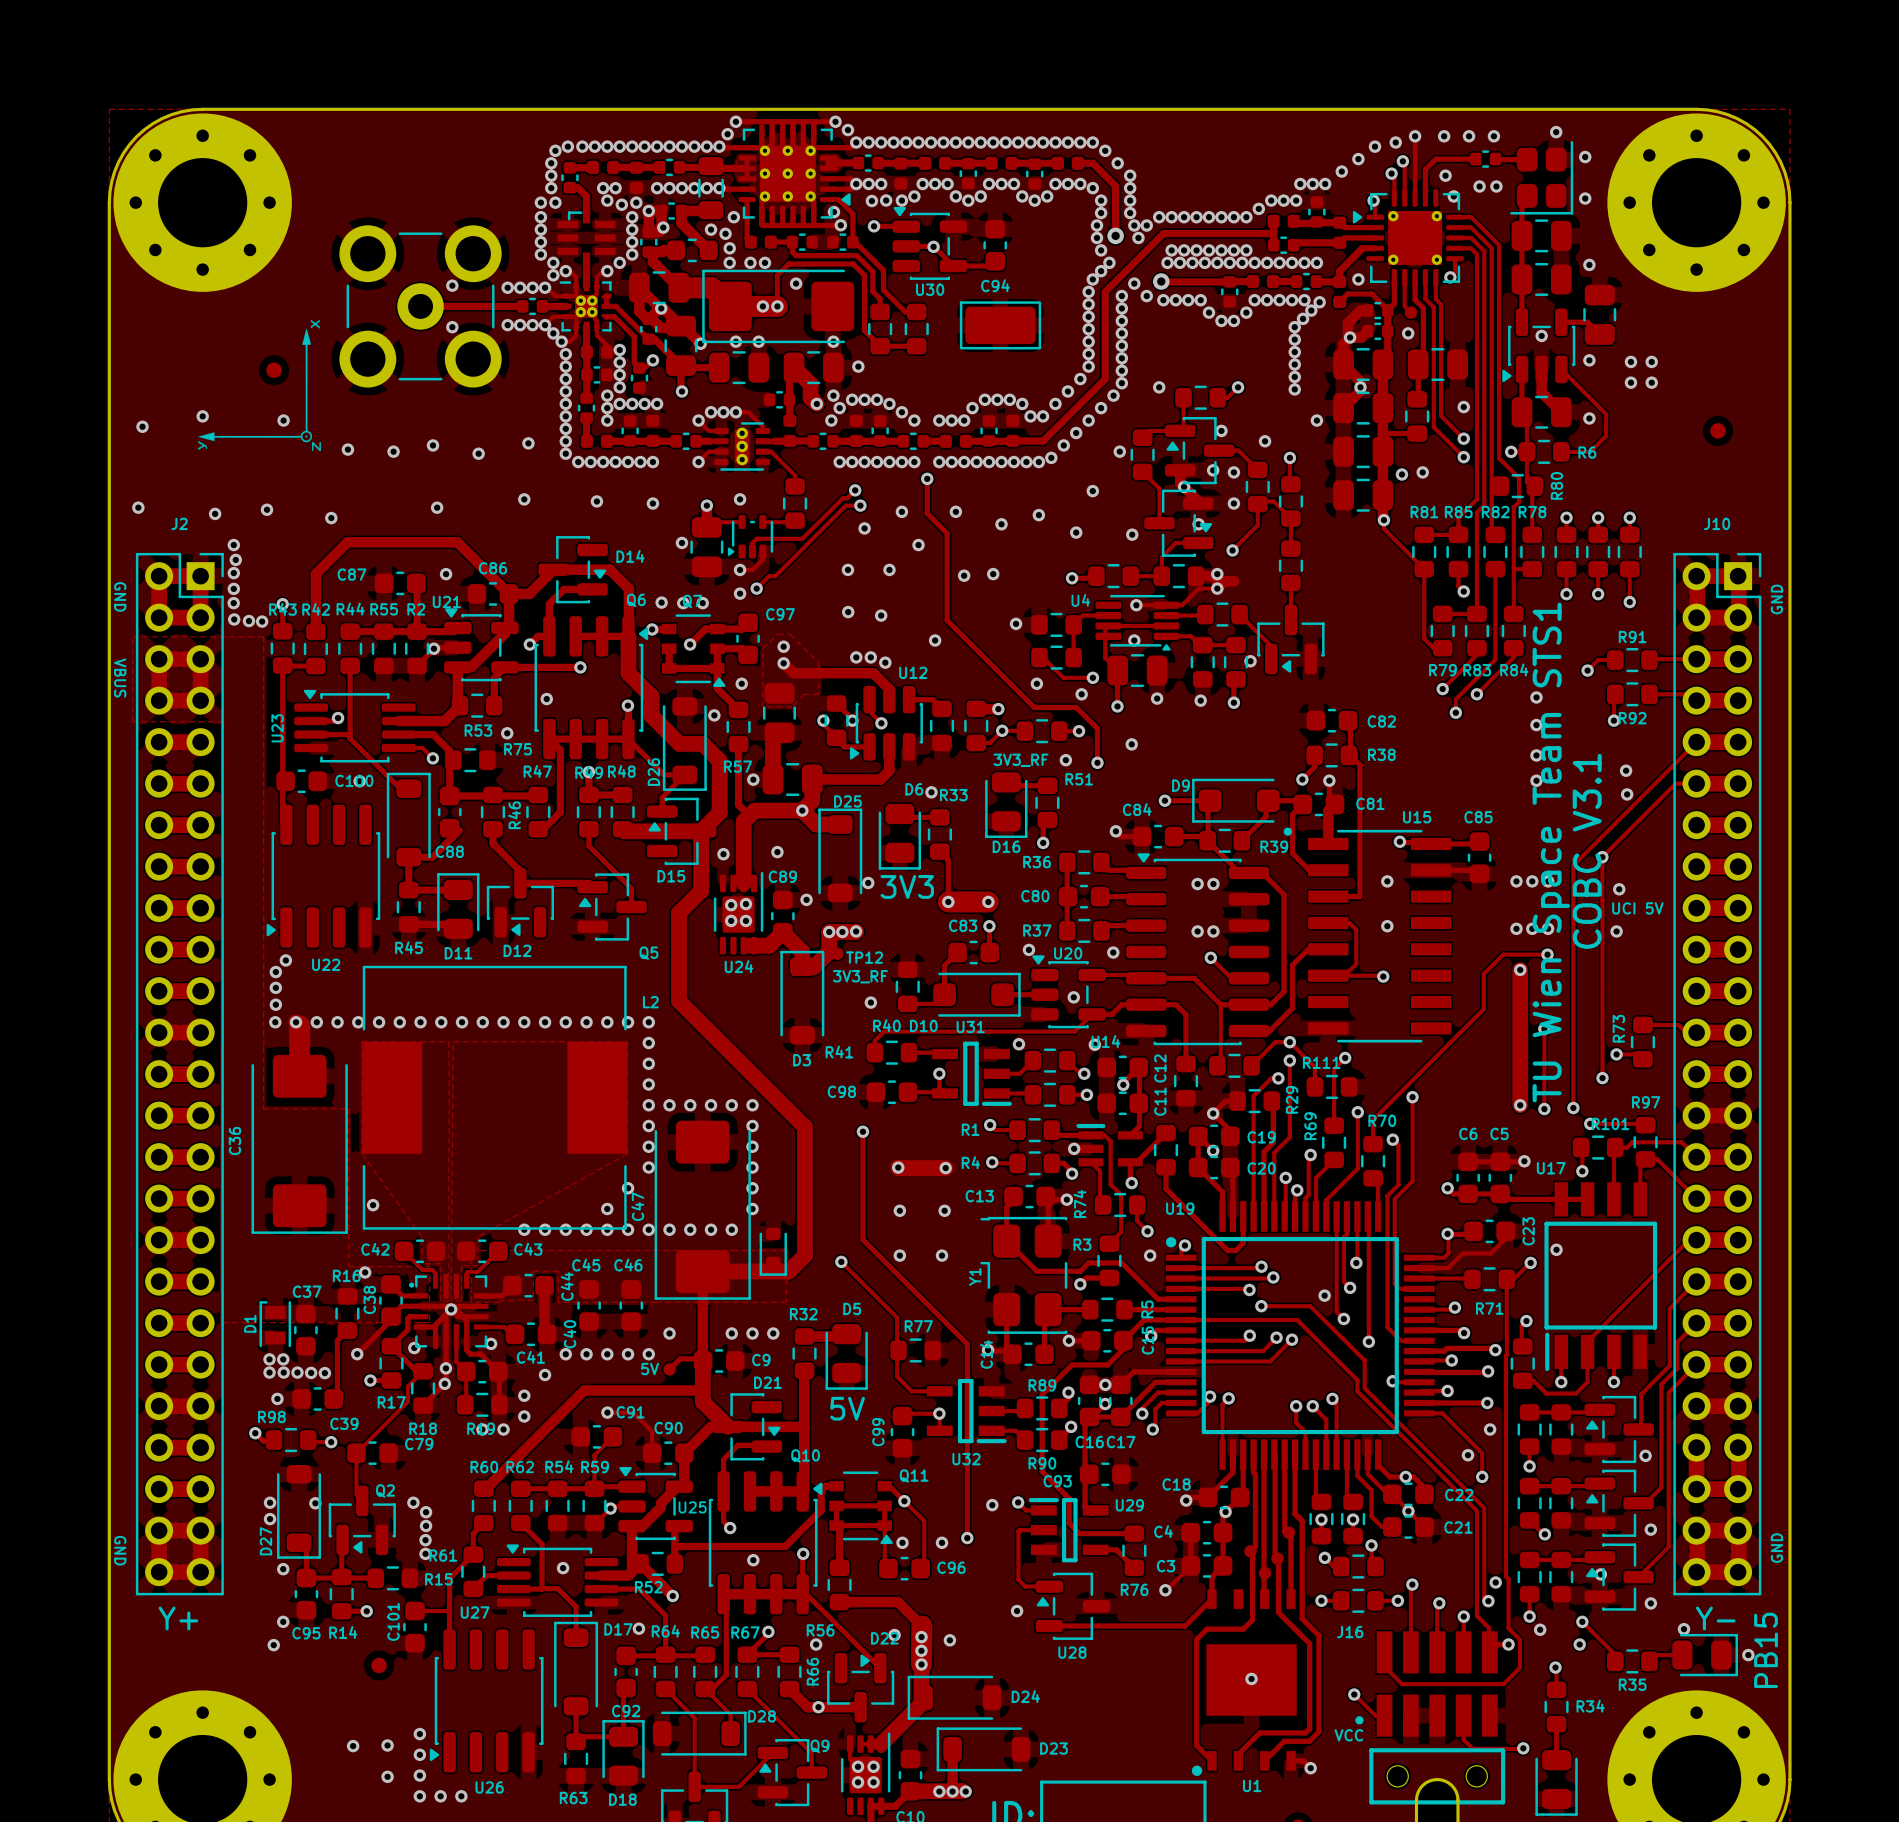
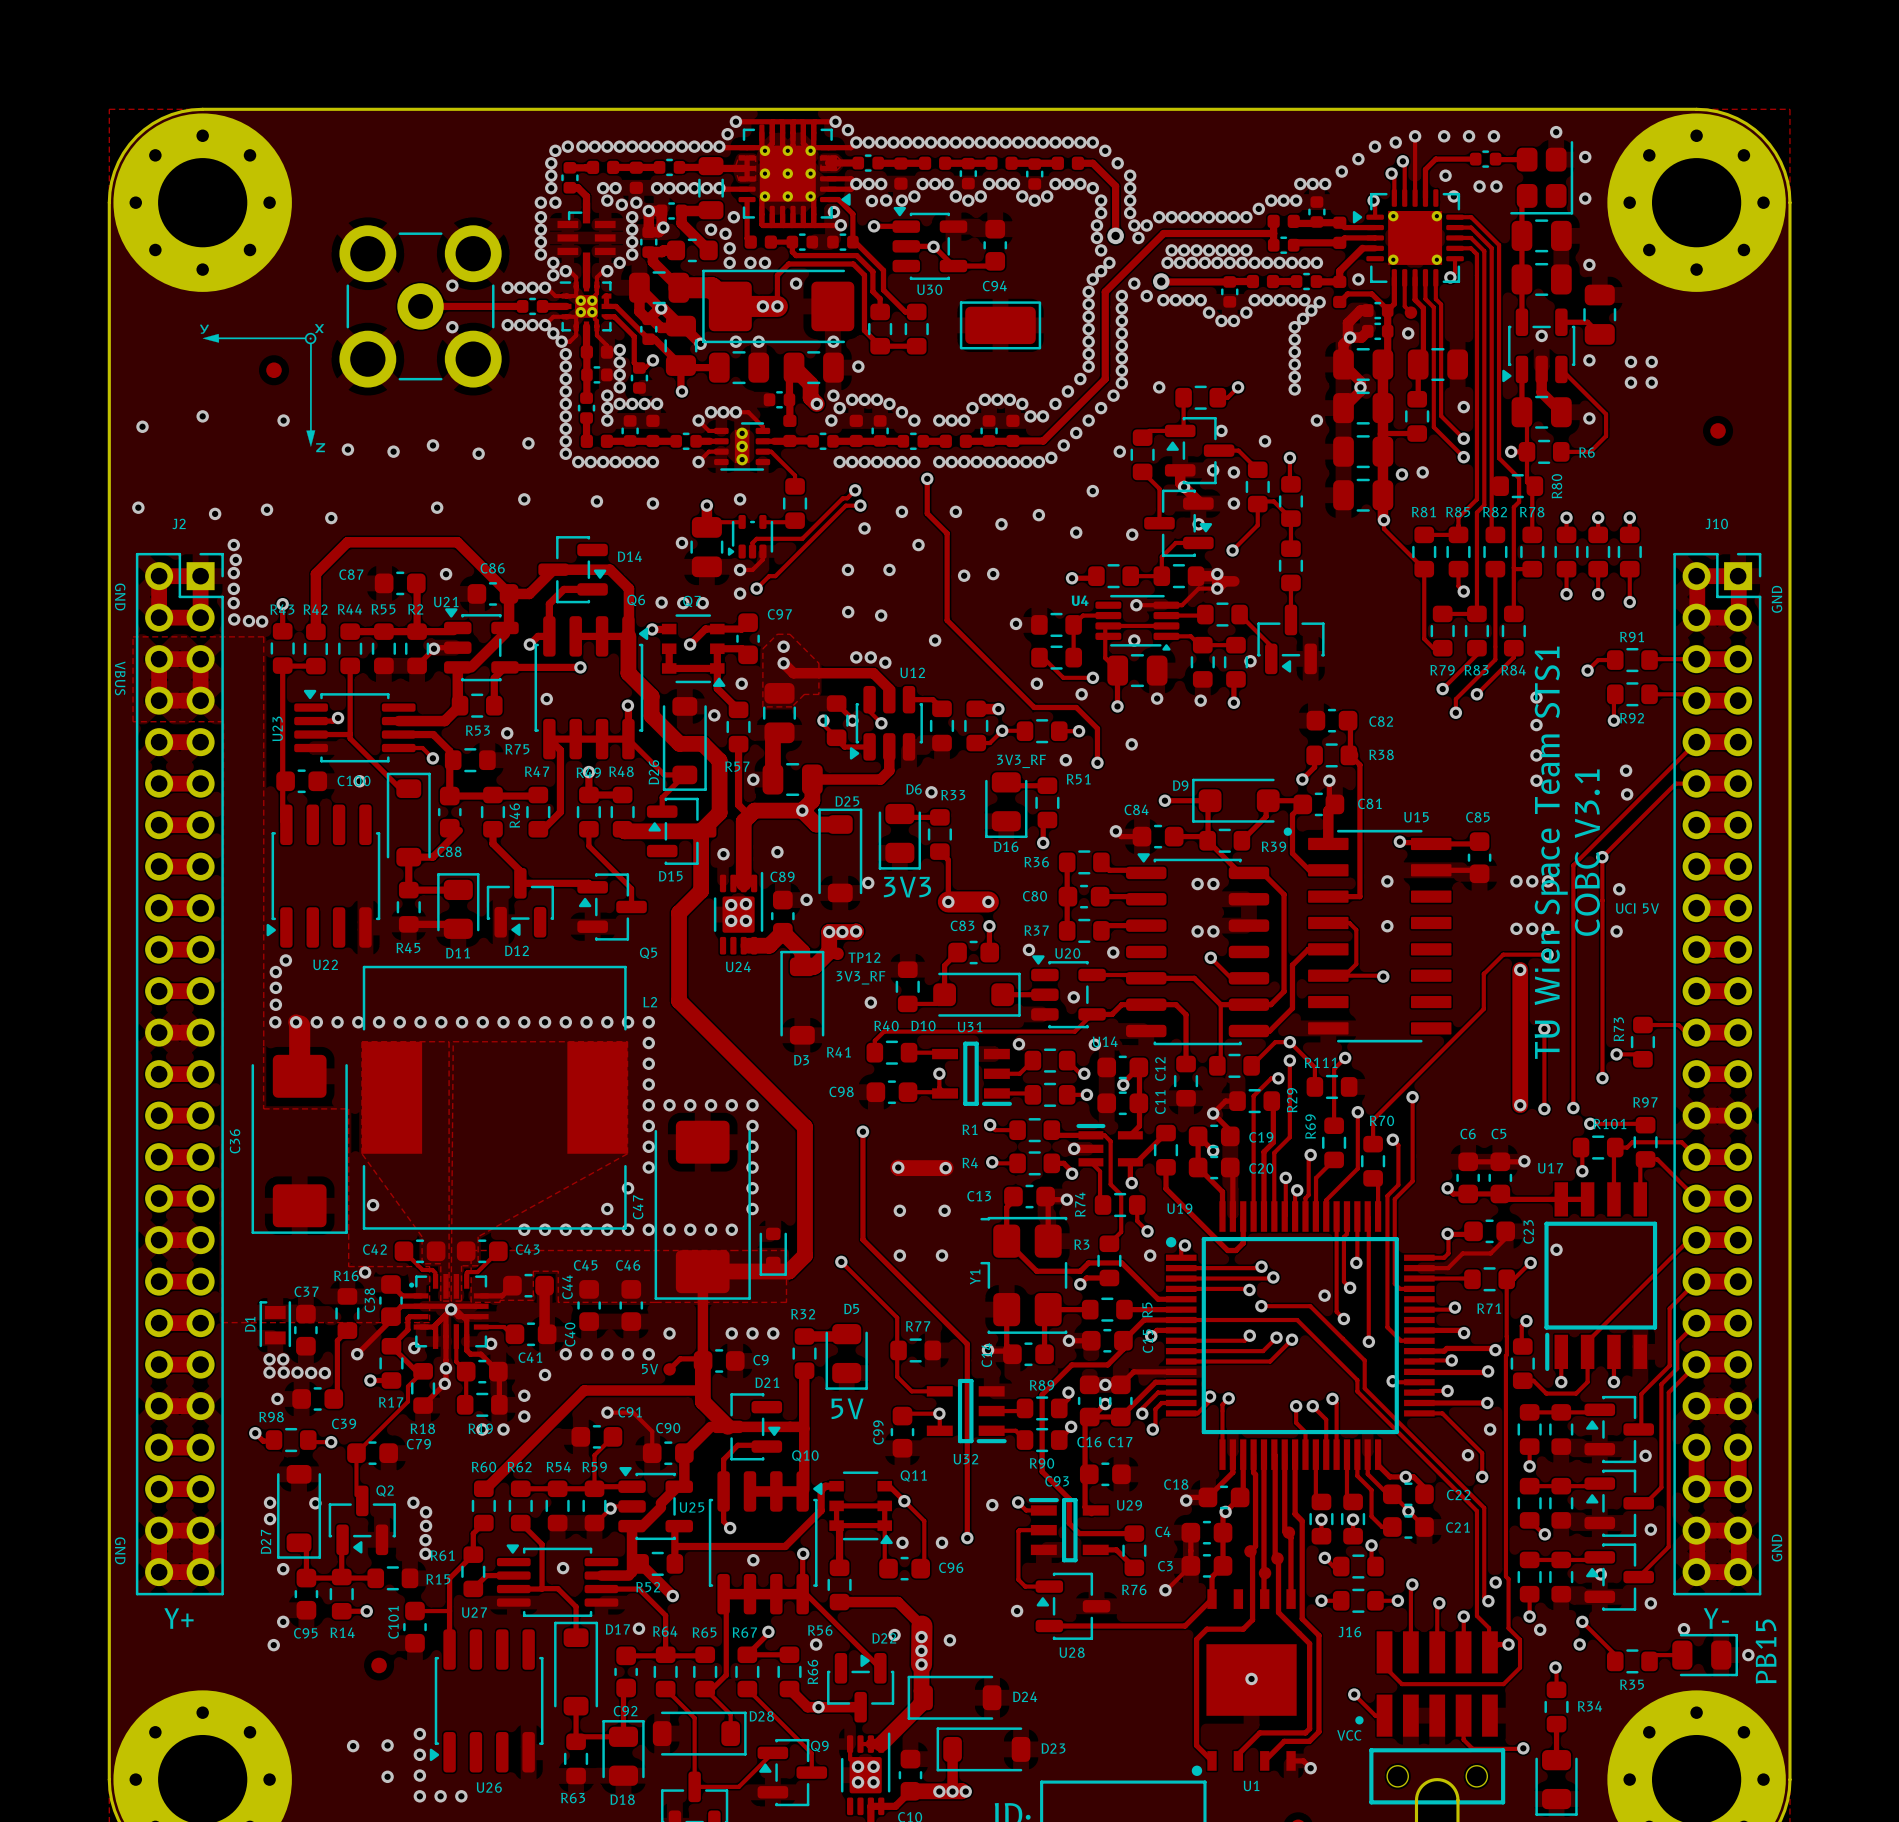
drawing shape: [198, 319, 321, 452] -> [199, 324, 326, 453]

